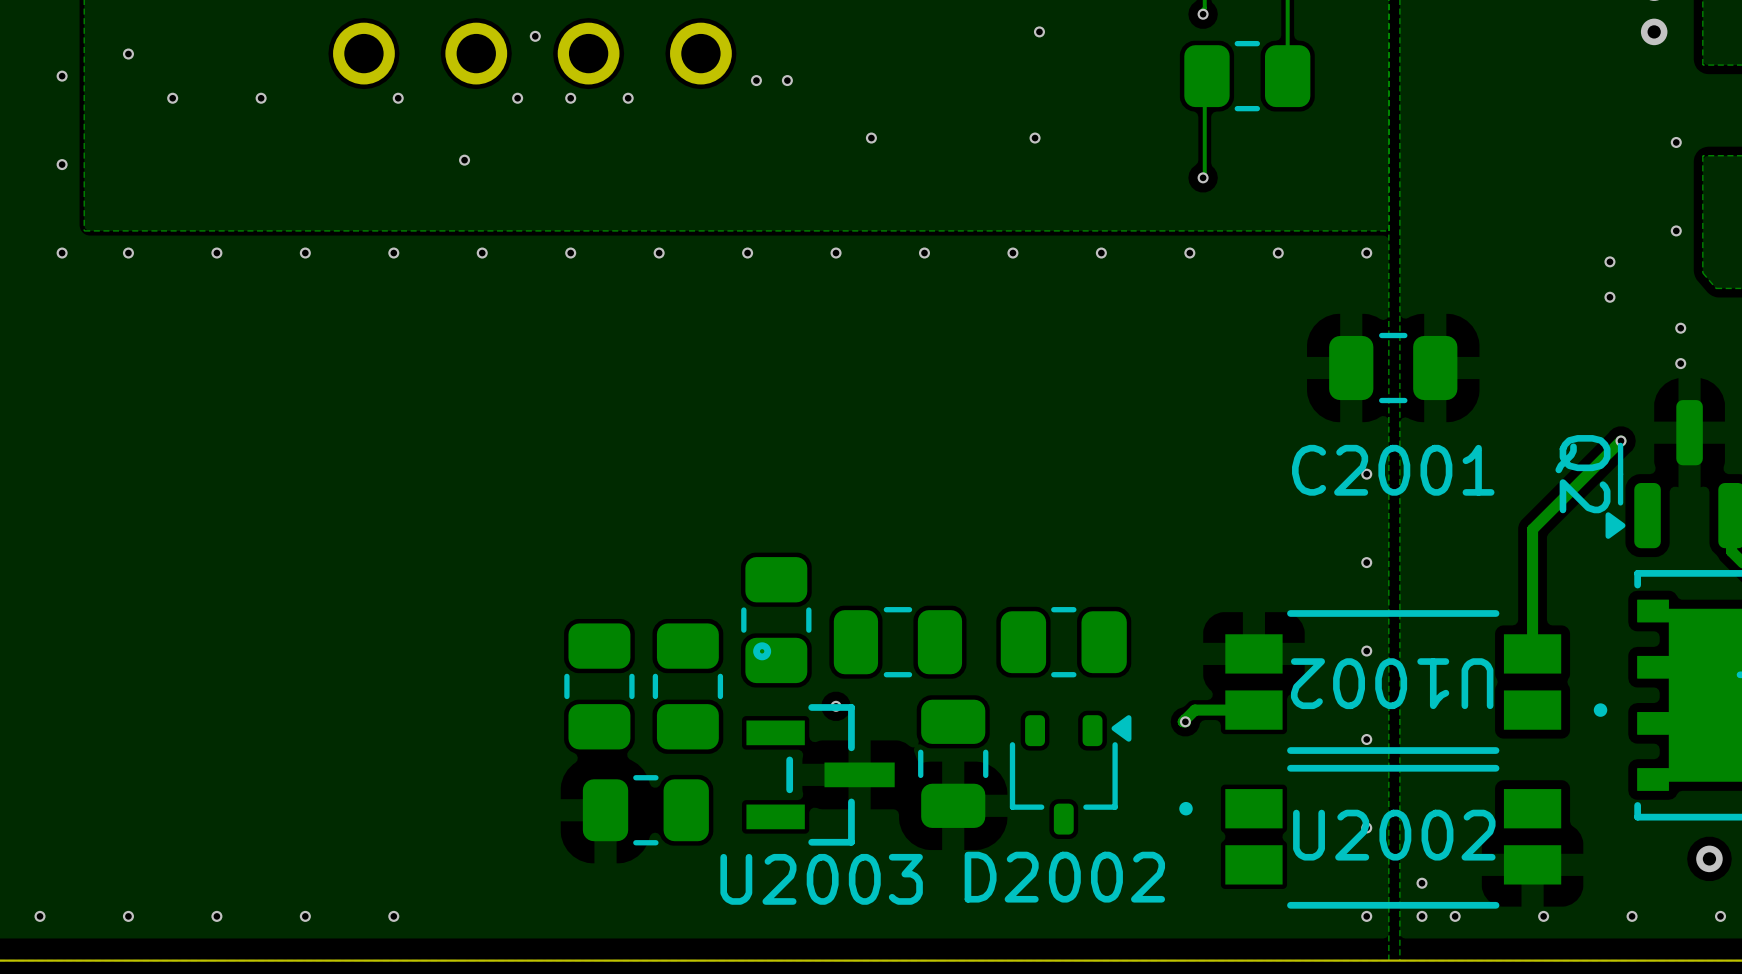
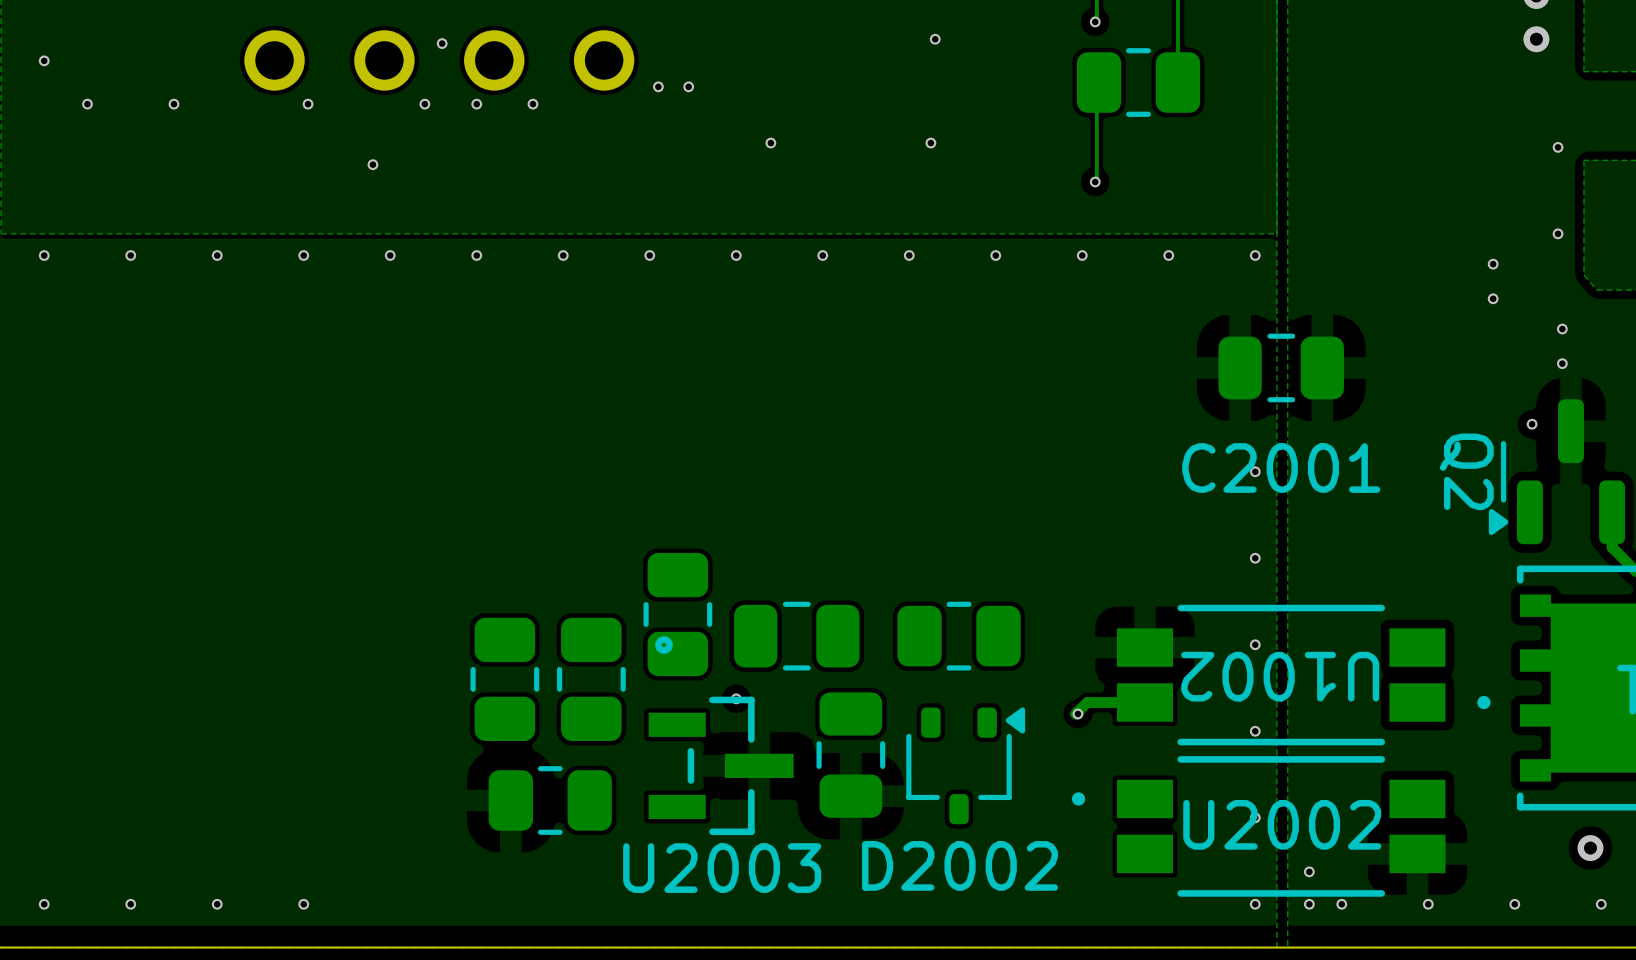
track: (1621, 440) (1532, 529) (1532, 653) -> none
via position: (1621, 440) -> (1532, 424)

